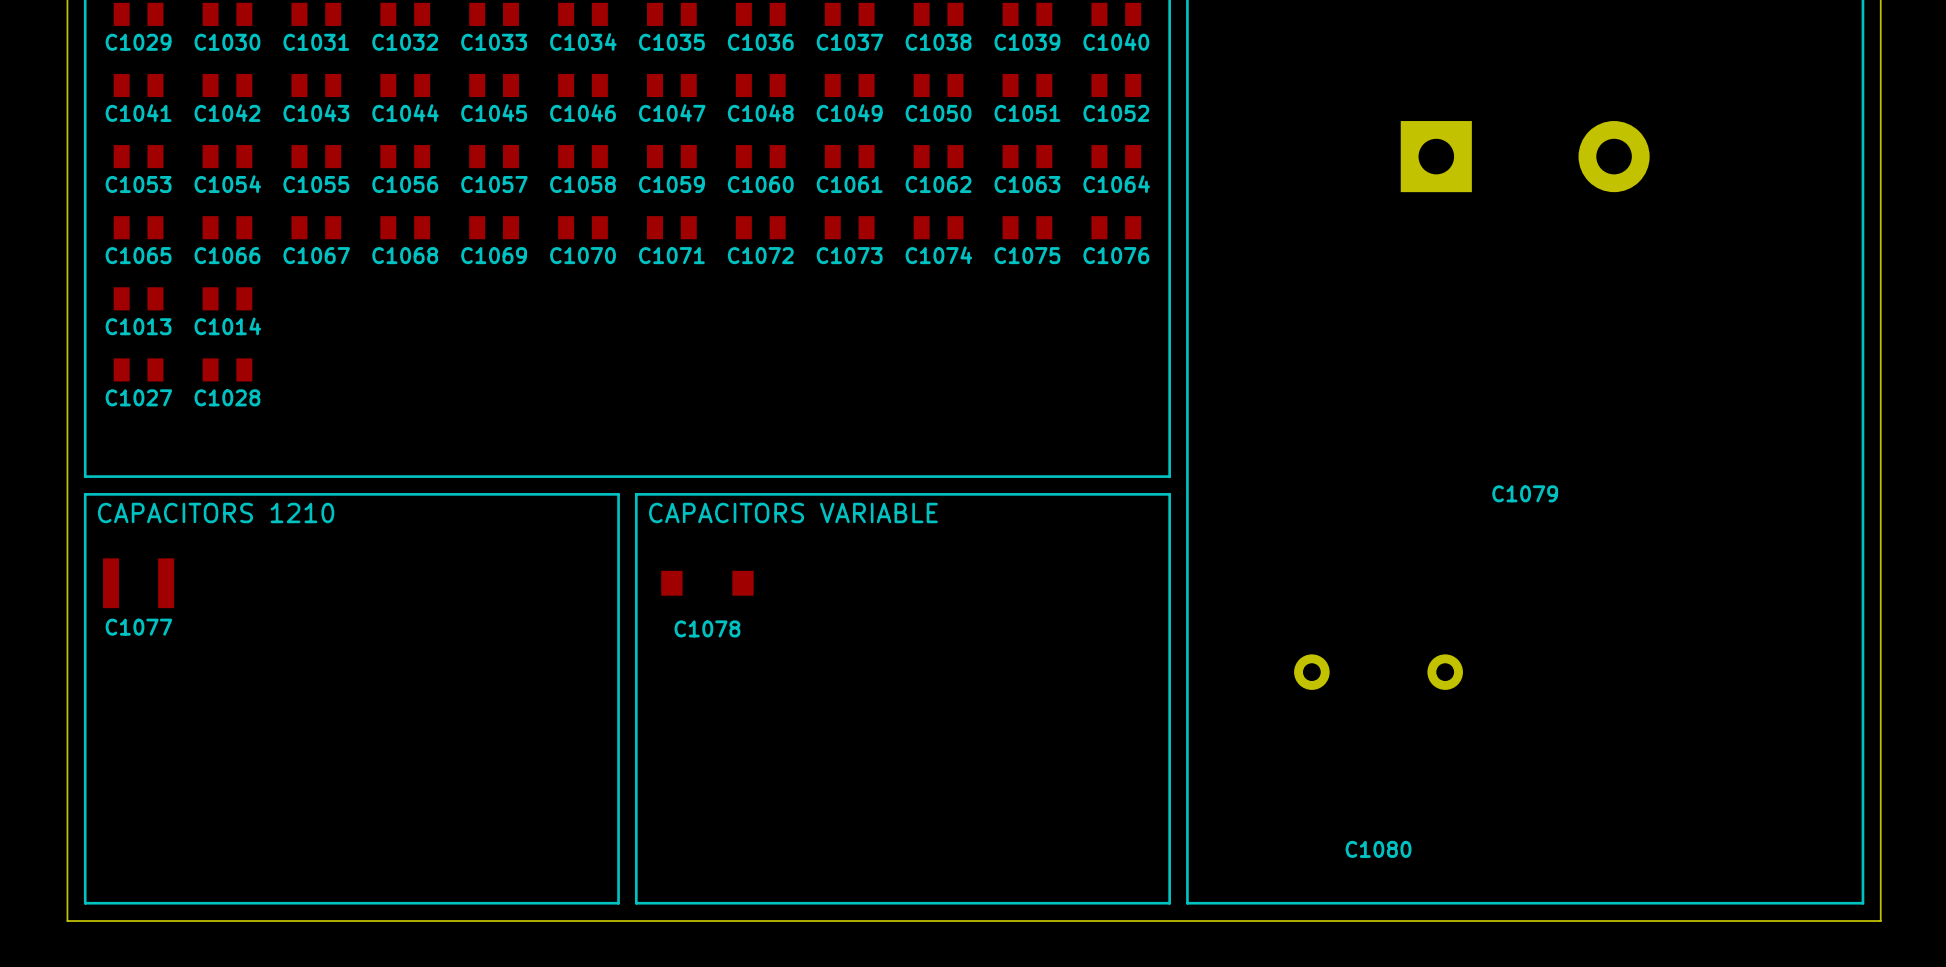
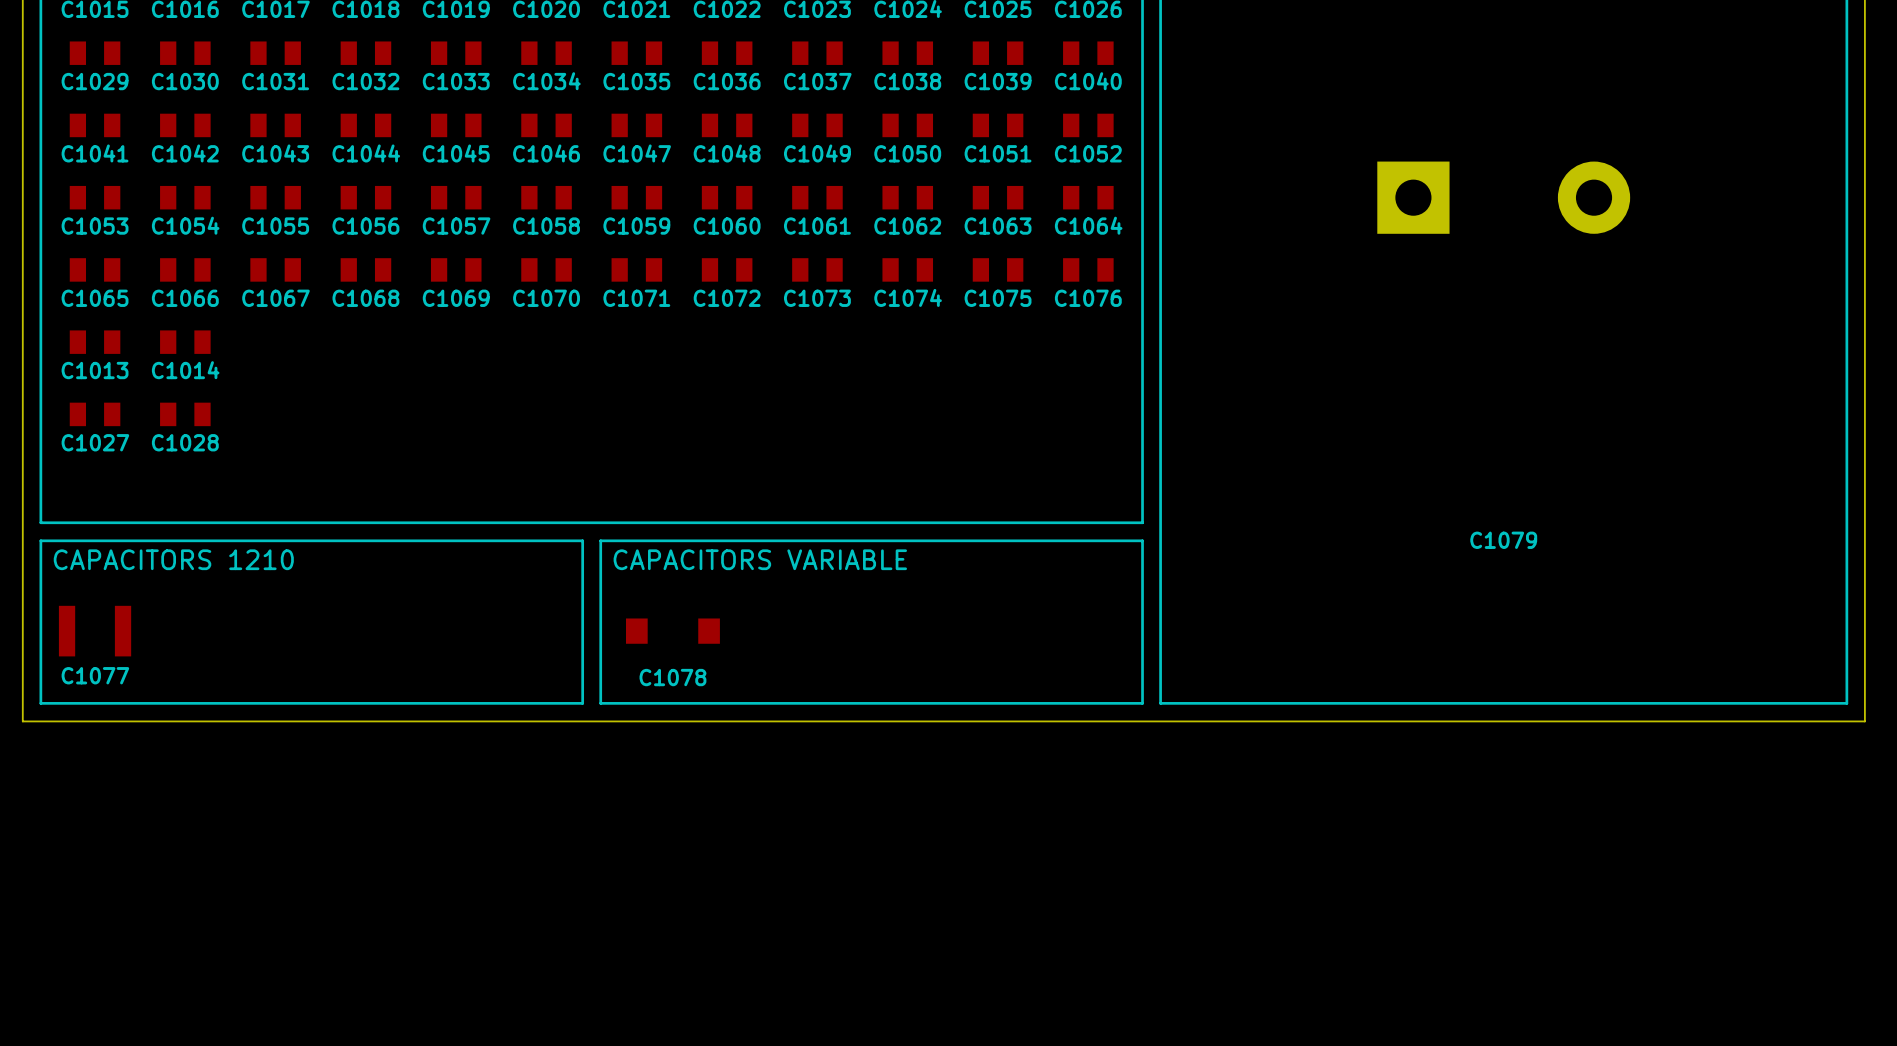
line: (85, 654) (85, 903) (618, 903) (618, 654) -> (40, 703) (582, 703)
line: (636, 654) (636, 903) (1169, 903) (1169, 654) -> (600, 703) (1142, 703)
line: (1187, 654) (1187, 903) (1862, 903) (1862, 654) -> (1160, 703) (1846, 703)
board edge: (67, 672) (67, 921) (1880, 921) (1880, 672) -> (22, 721) (1864, 721)
C1080: (1378, 672) -> none

